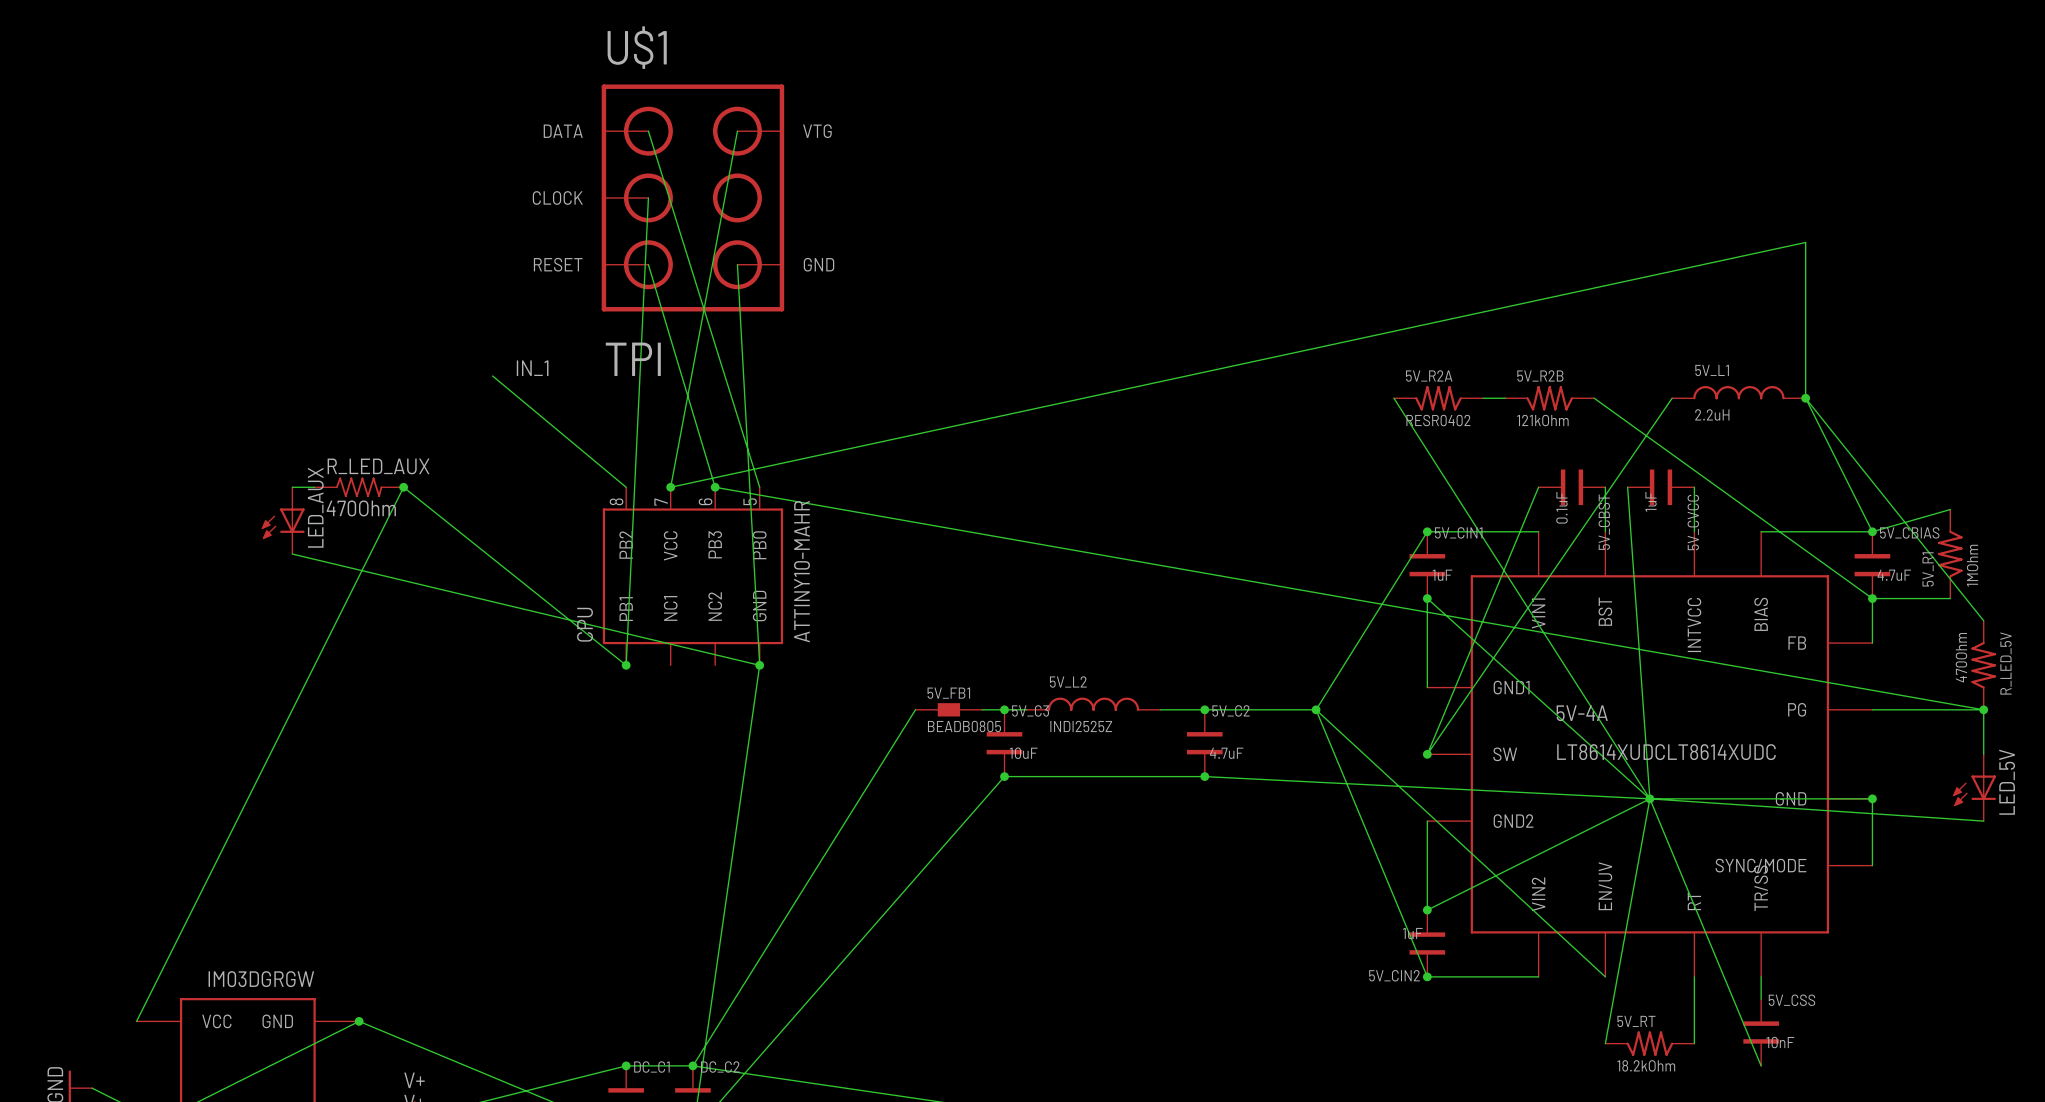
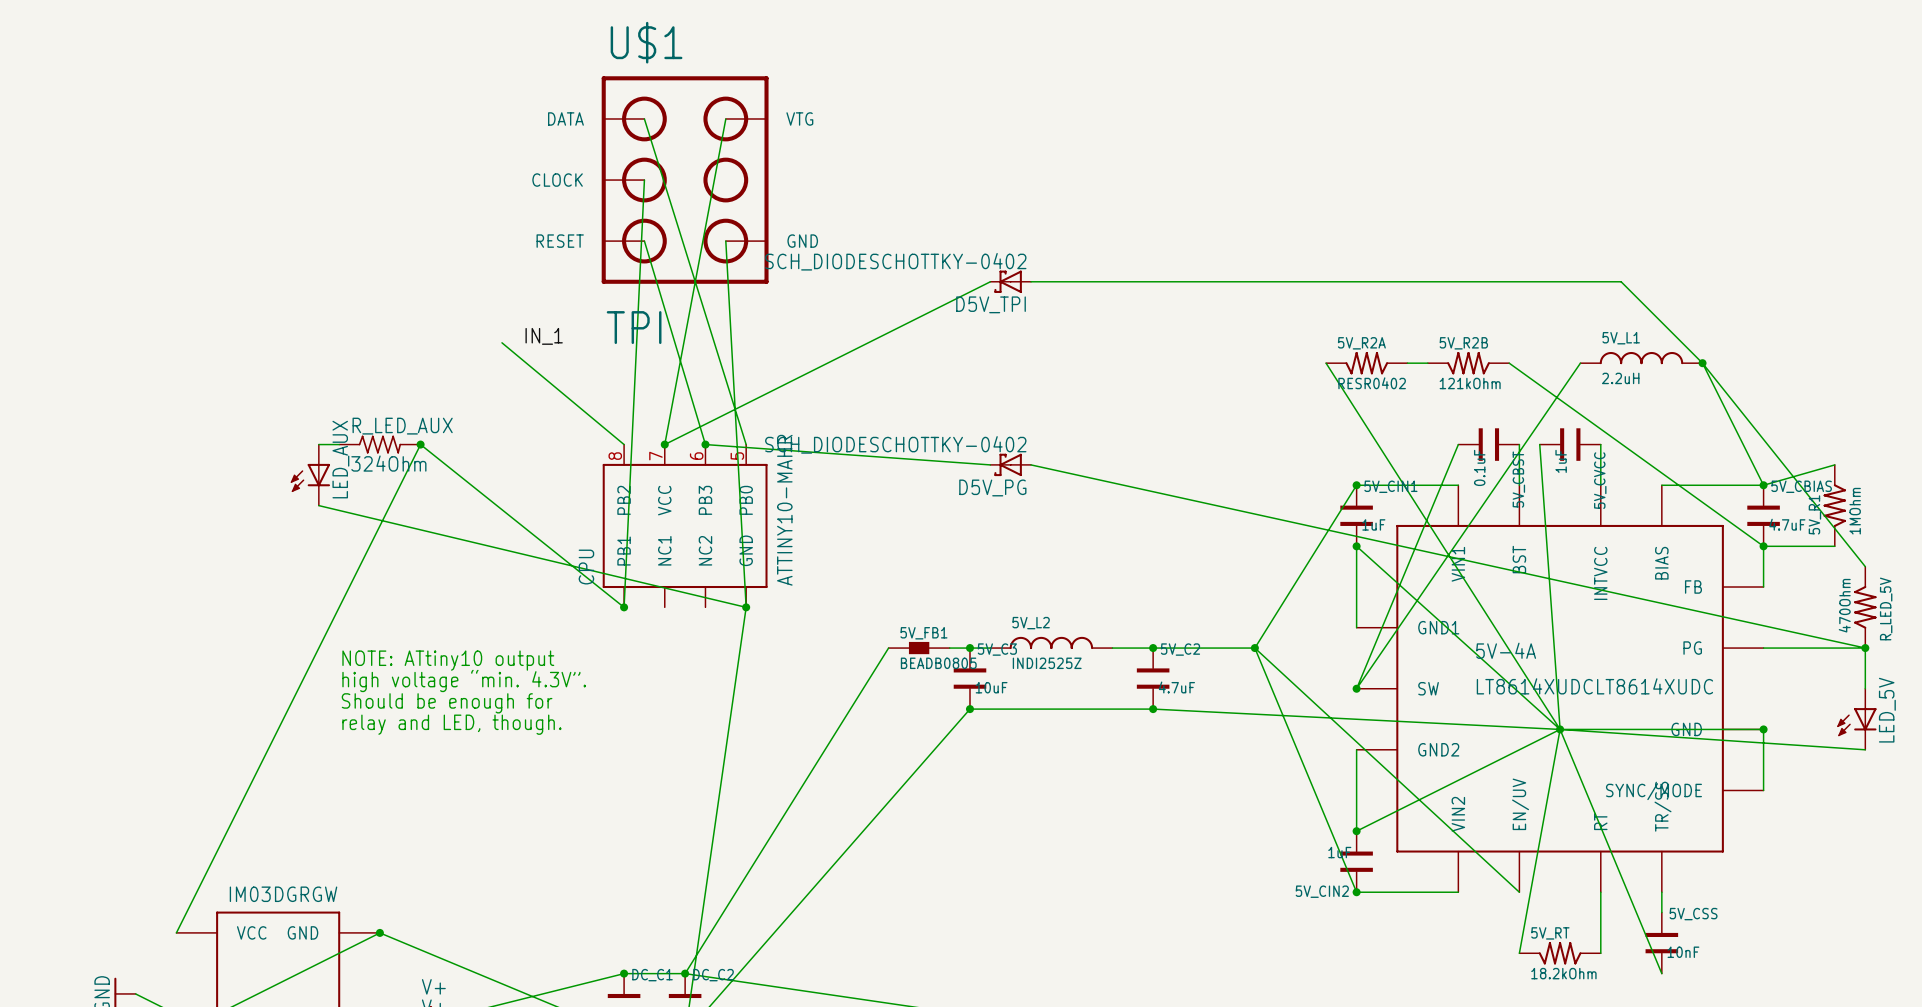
wire: none -> (990, 281) (664, 444)
D5V_TPI: none -> SCH_DIODESCHOTTKY-0402 (1010, 281)
wire: (1805, 398) (1805, 242) (670, 487) -> (1702, 363) (1621, 281) (1031, 281)
wire: (715, 487) (1983, 709) -> (1031, 464) (1865, 648)
wire: none -> (705, 444) (990, 464)
R_LED_AUX value: 470Ohm (361, 508) -> 324Ohm (388, 463)
D5V_PG: none -> SCH_DIODESCHOTTKY-0402 (1010, 464)
text: none -> NOTE: ATtiny10 output (448, 660)
text: none -> high voltage “min. 4.3V”. (464, 680)
text: none -> Should be enough for (447, 703)
text: none -> relay and LED, though. (451, 724)

